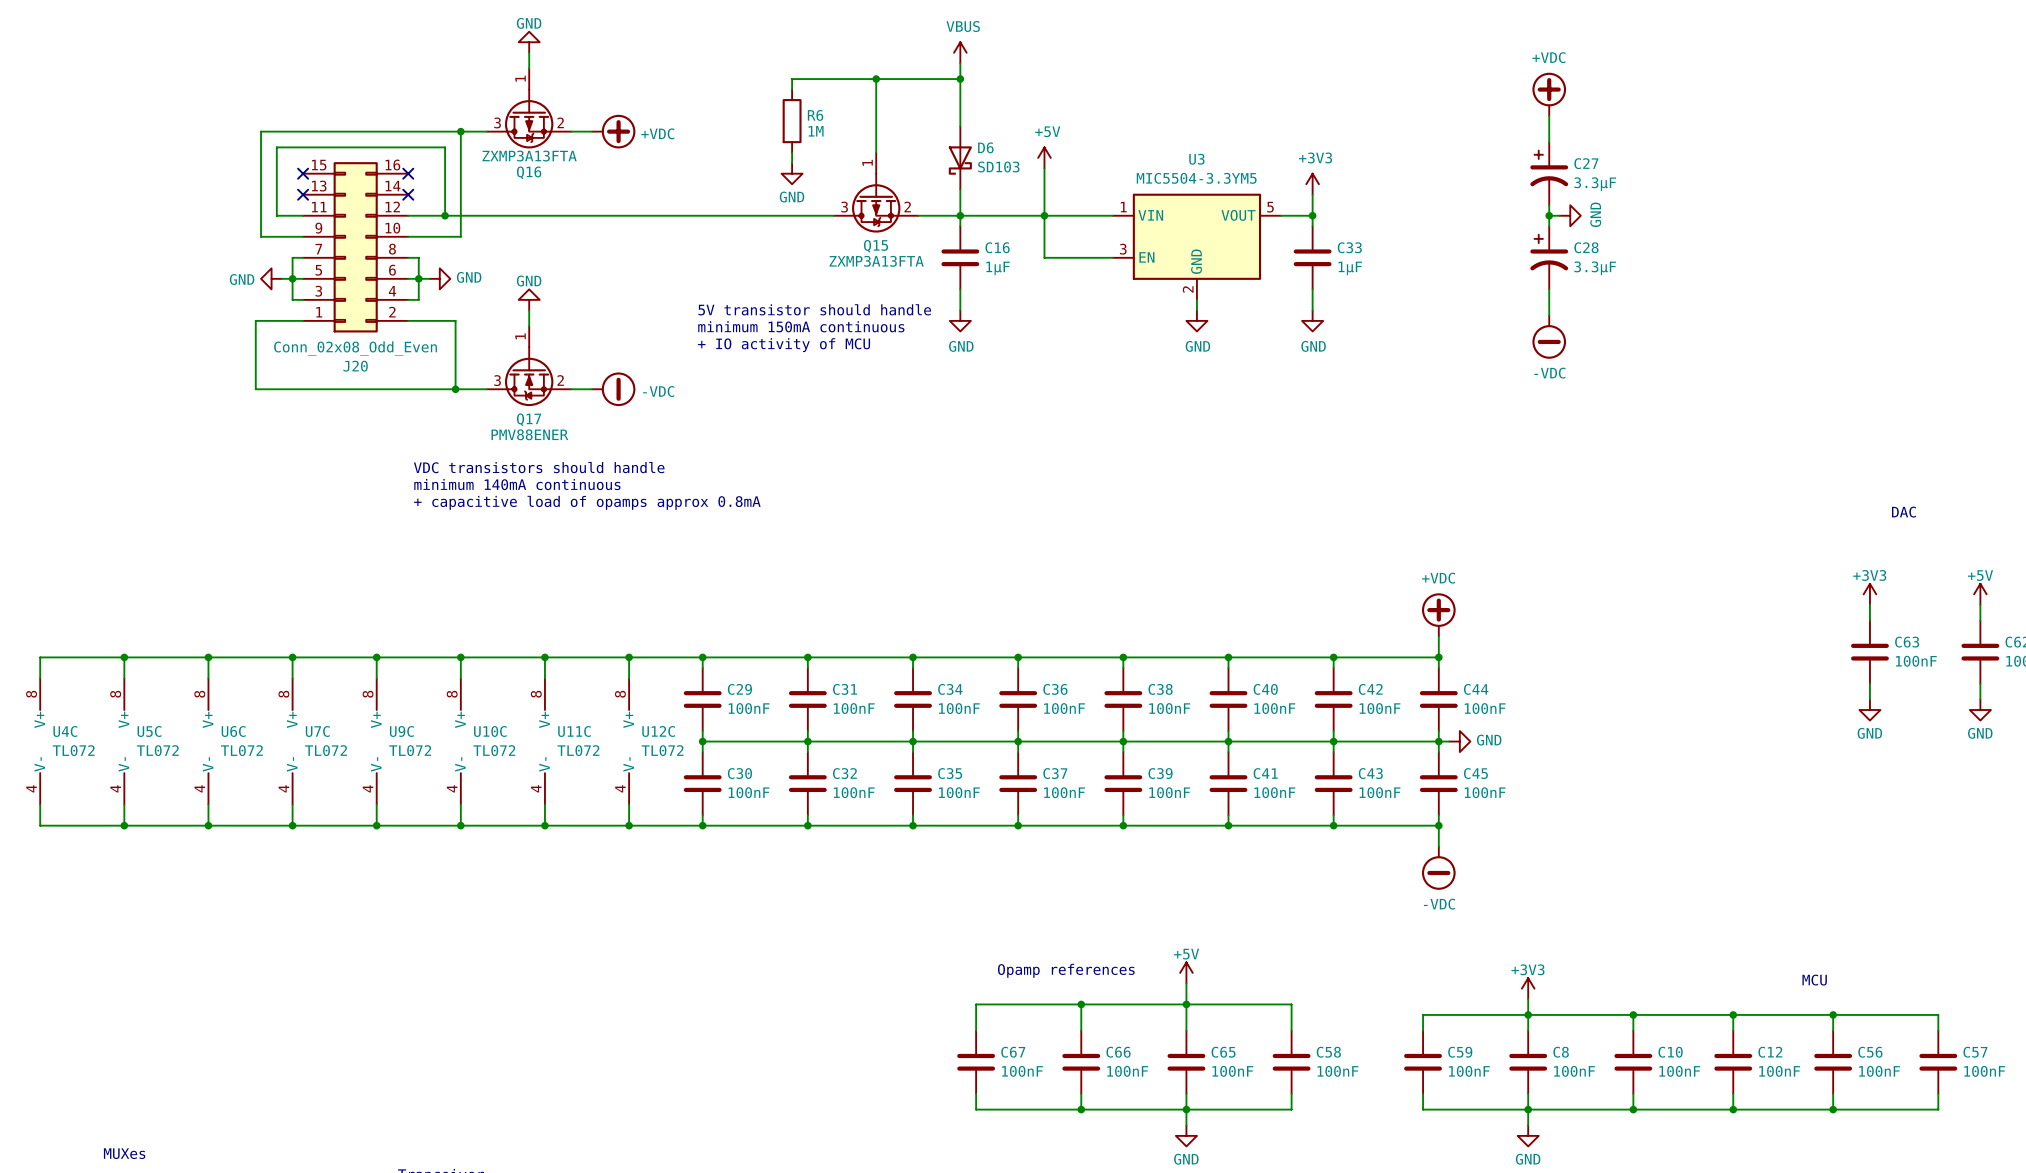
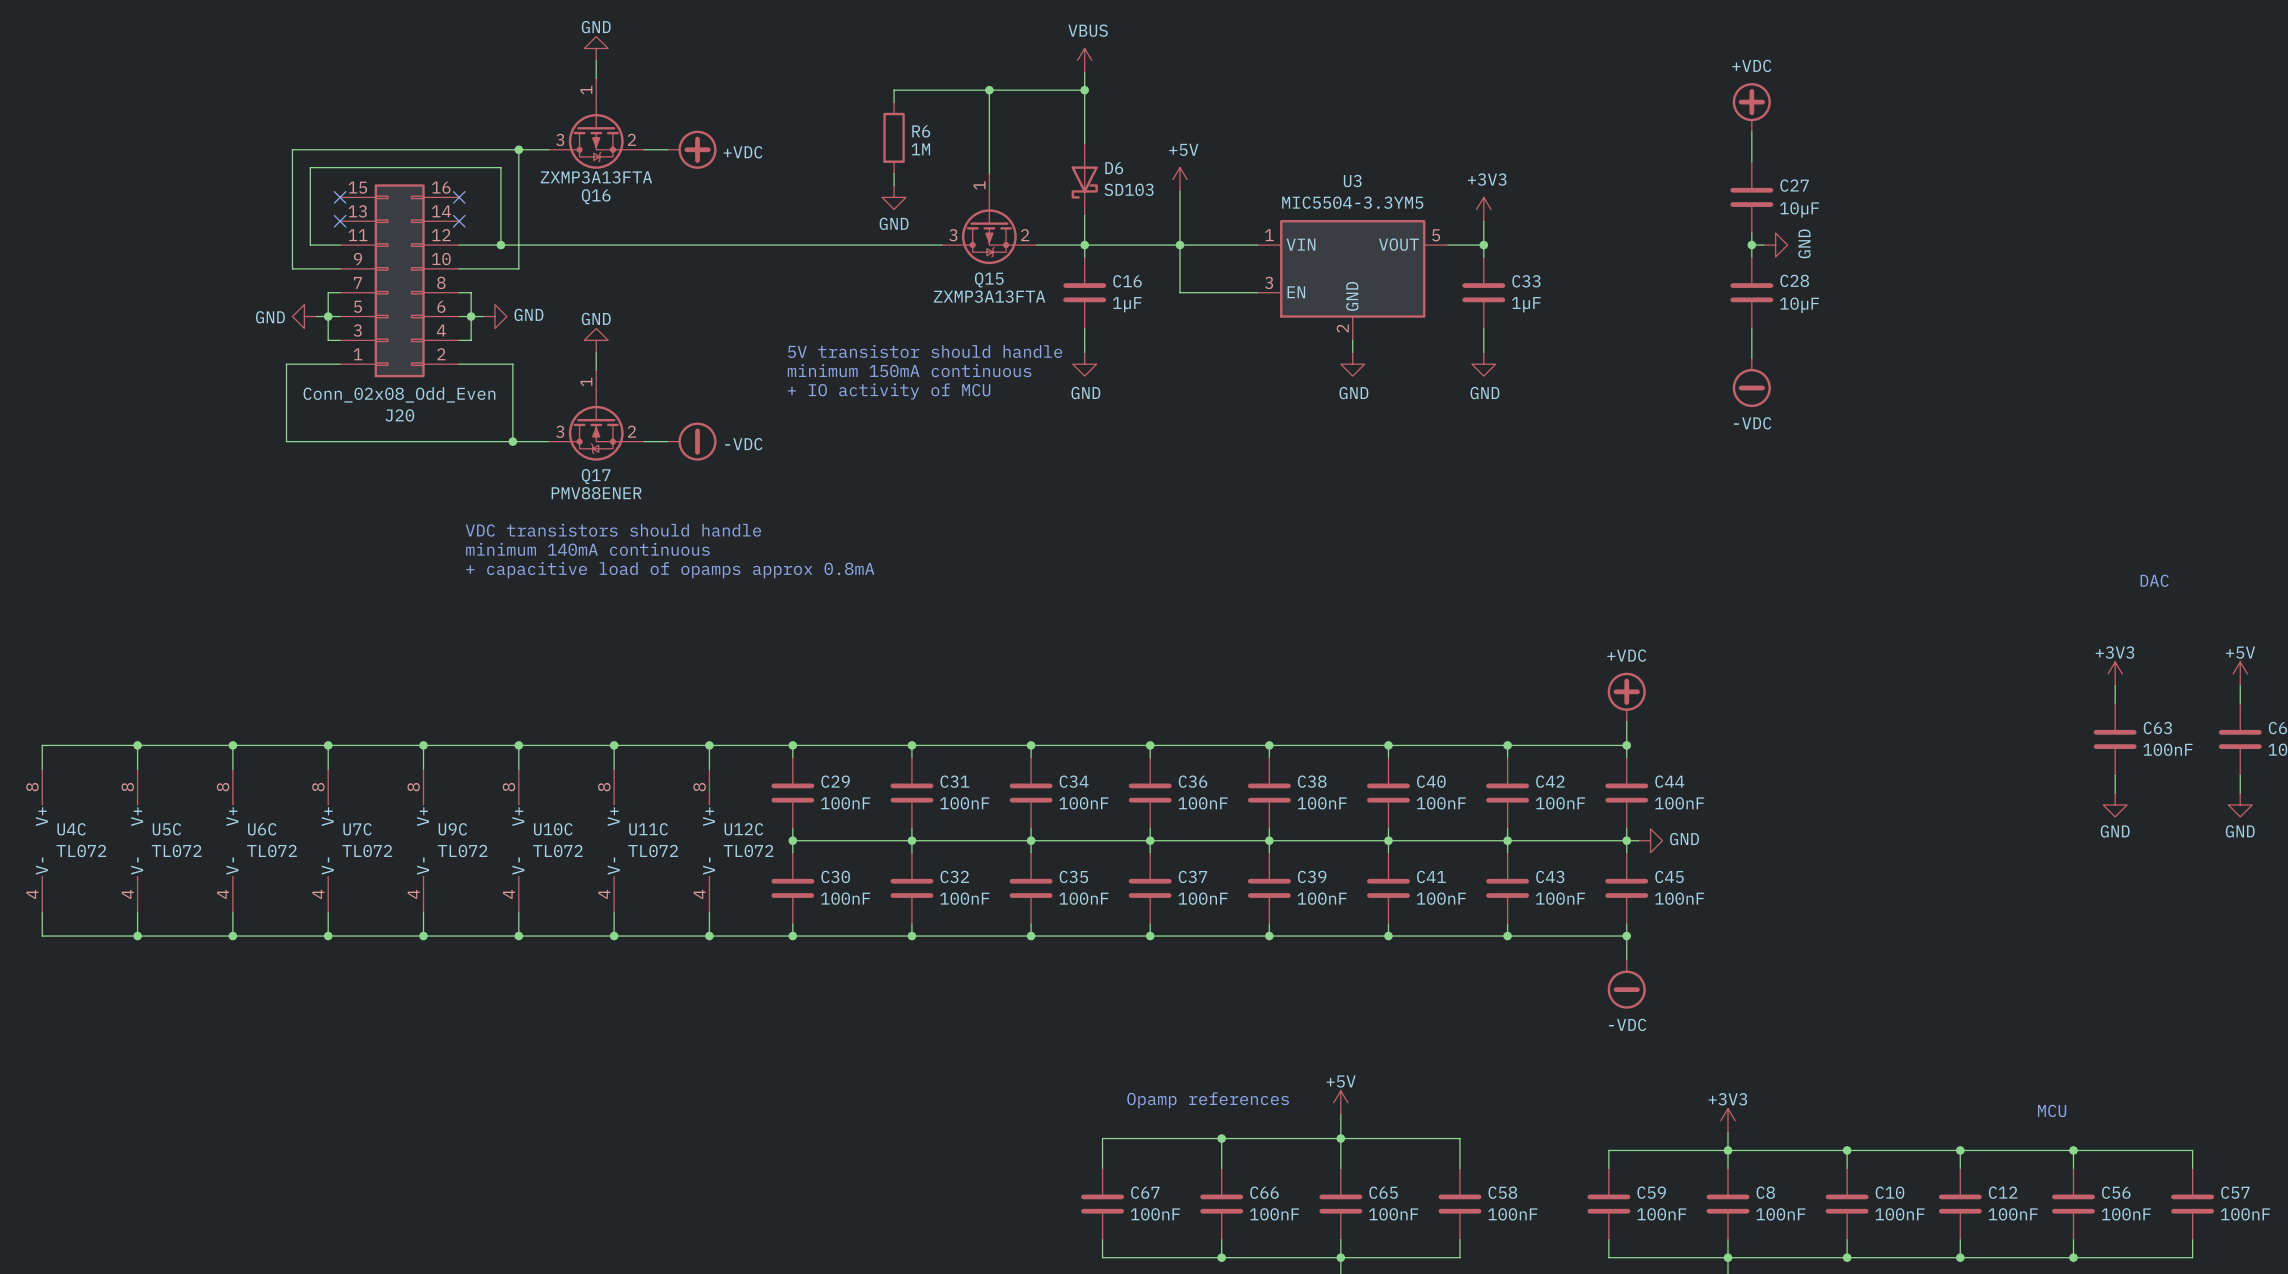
C27 symbol: [1530, 142, 1569, 206] -> [1730, 161, 1774, 234]
C27 value: 3.3µF (1595, 184) -> 10µF (1799, 209)
C28 symbol: [1530, 226, 1569, 290] -> [1730, 256, 1774, 329]
C28 value: 3.3µF (1595, 268) -> 10µF (1799, 305)

